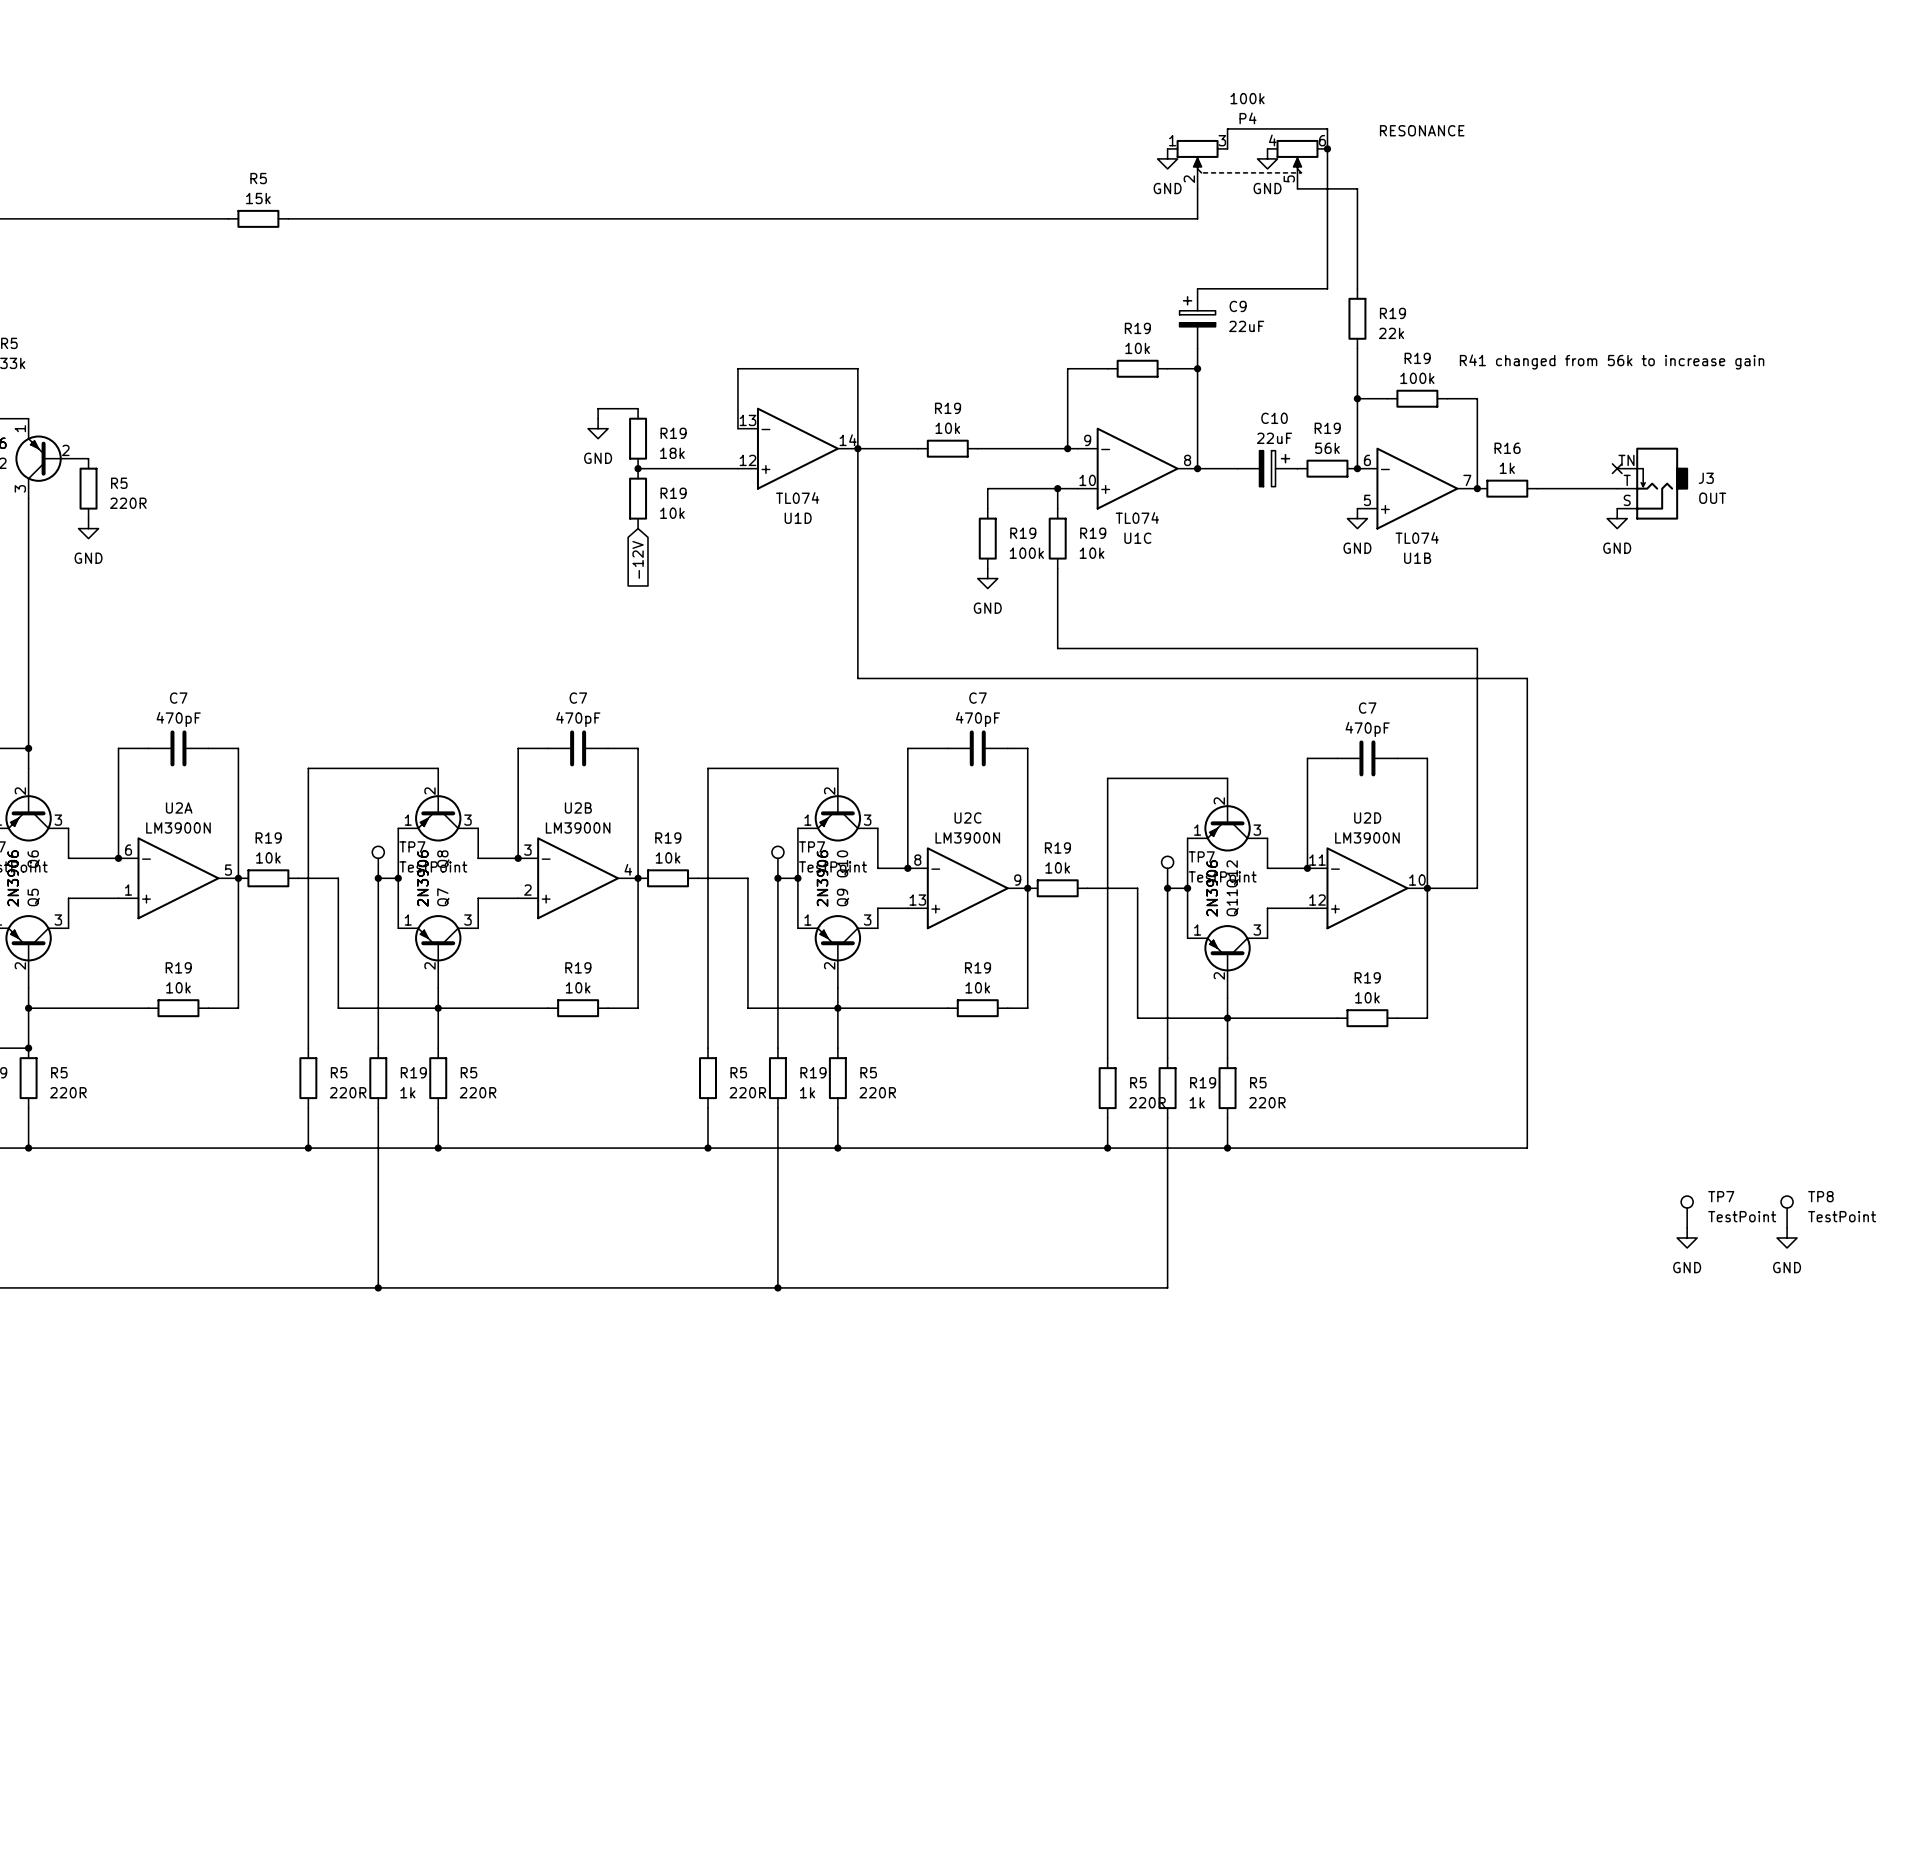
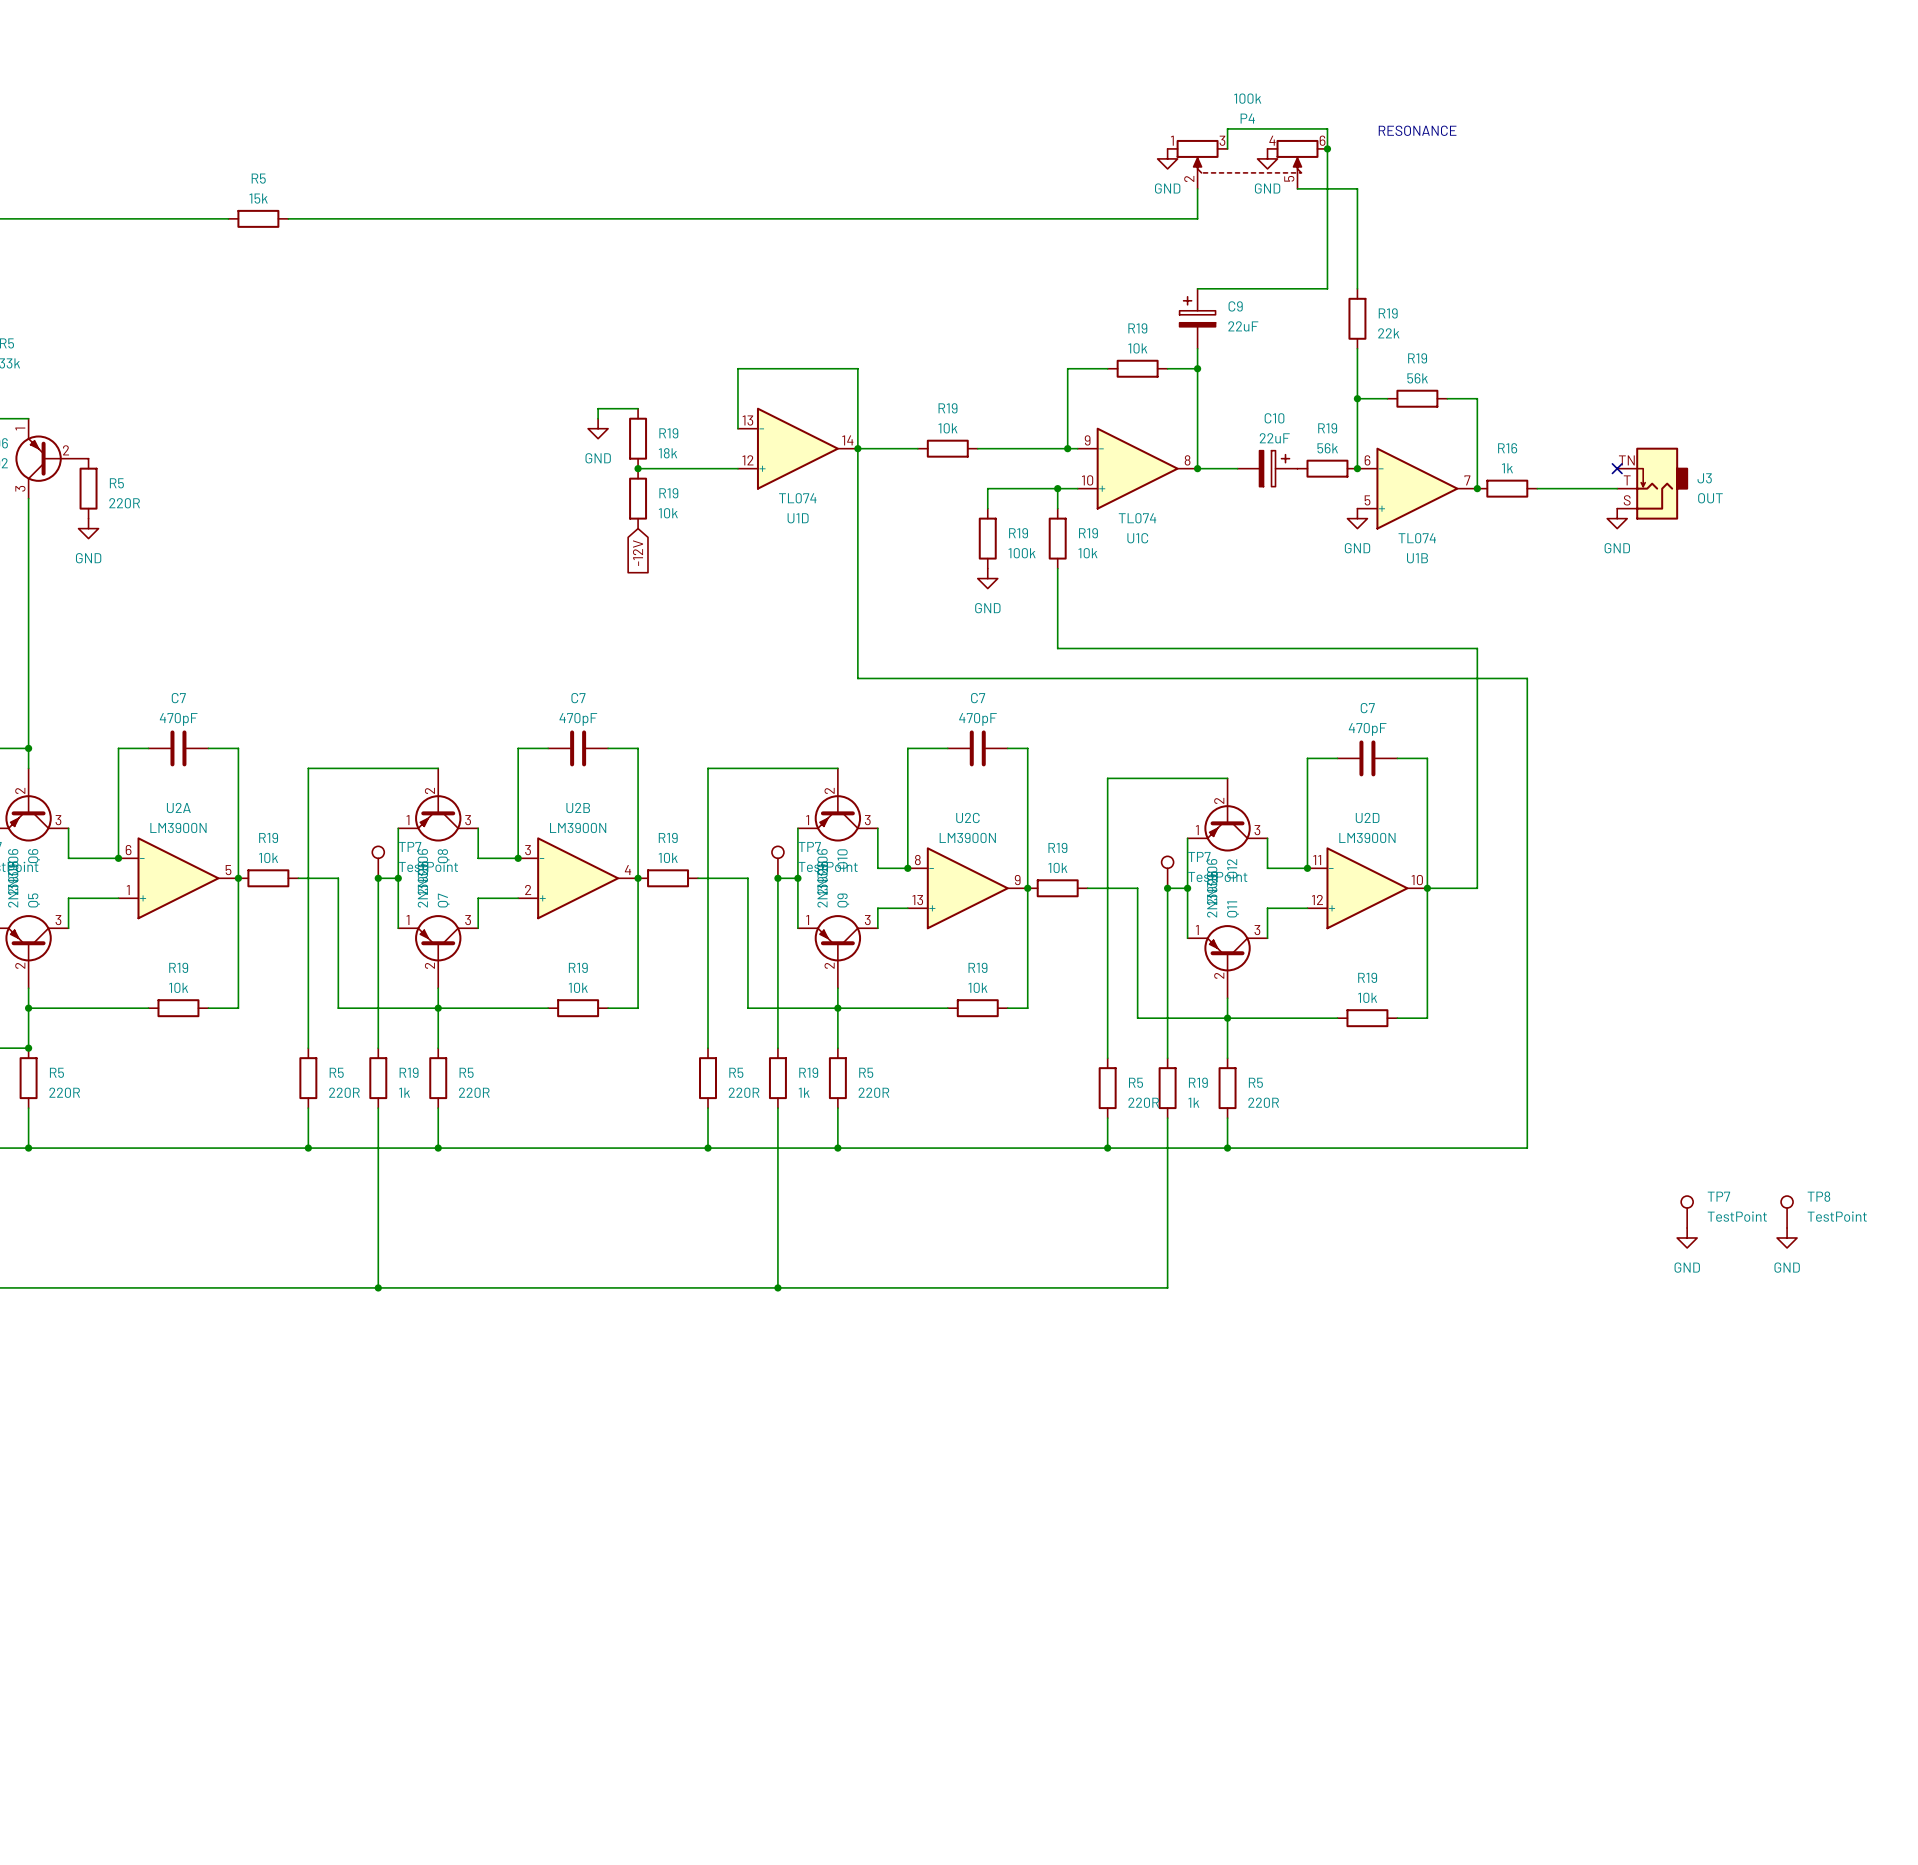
text: R41 changed from 56k to increase gain (1612, 361) -> none
R19 value: 100k (1417, 378) -> 56k (1417, 378)

